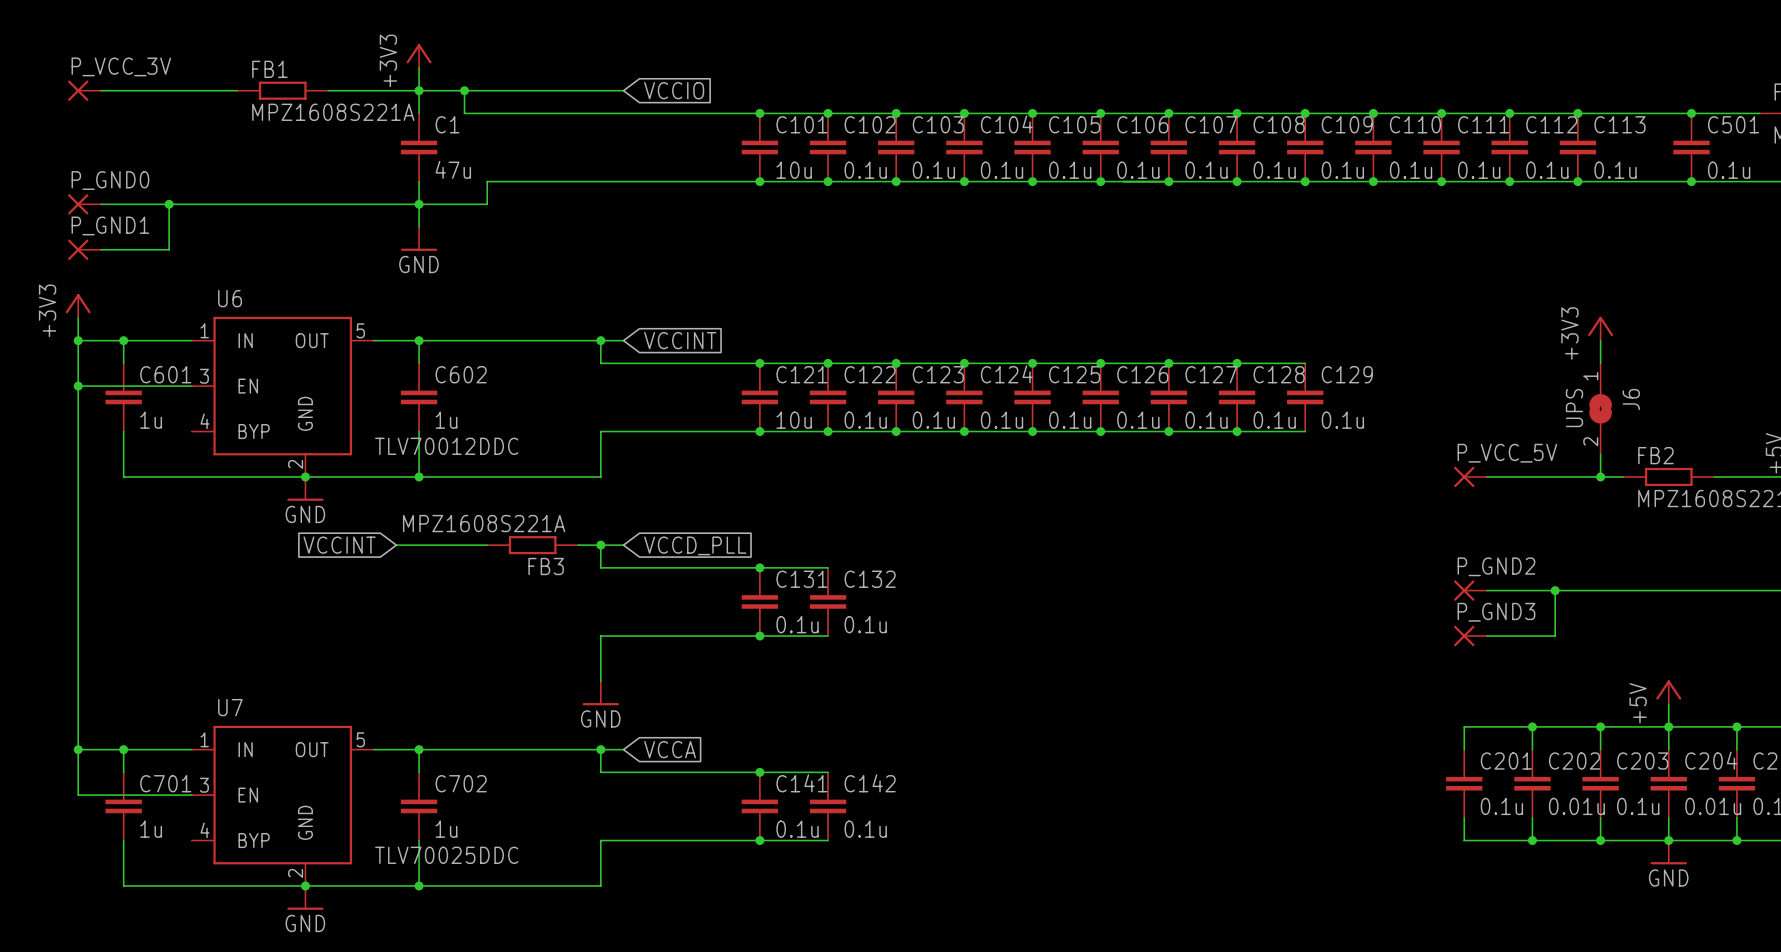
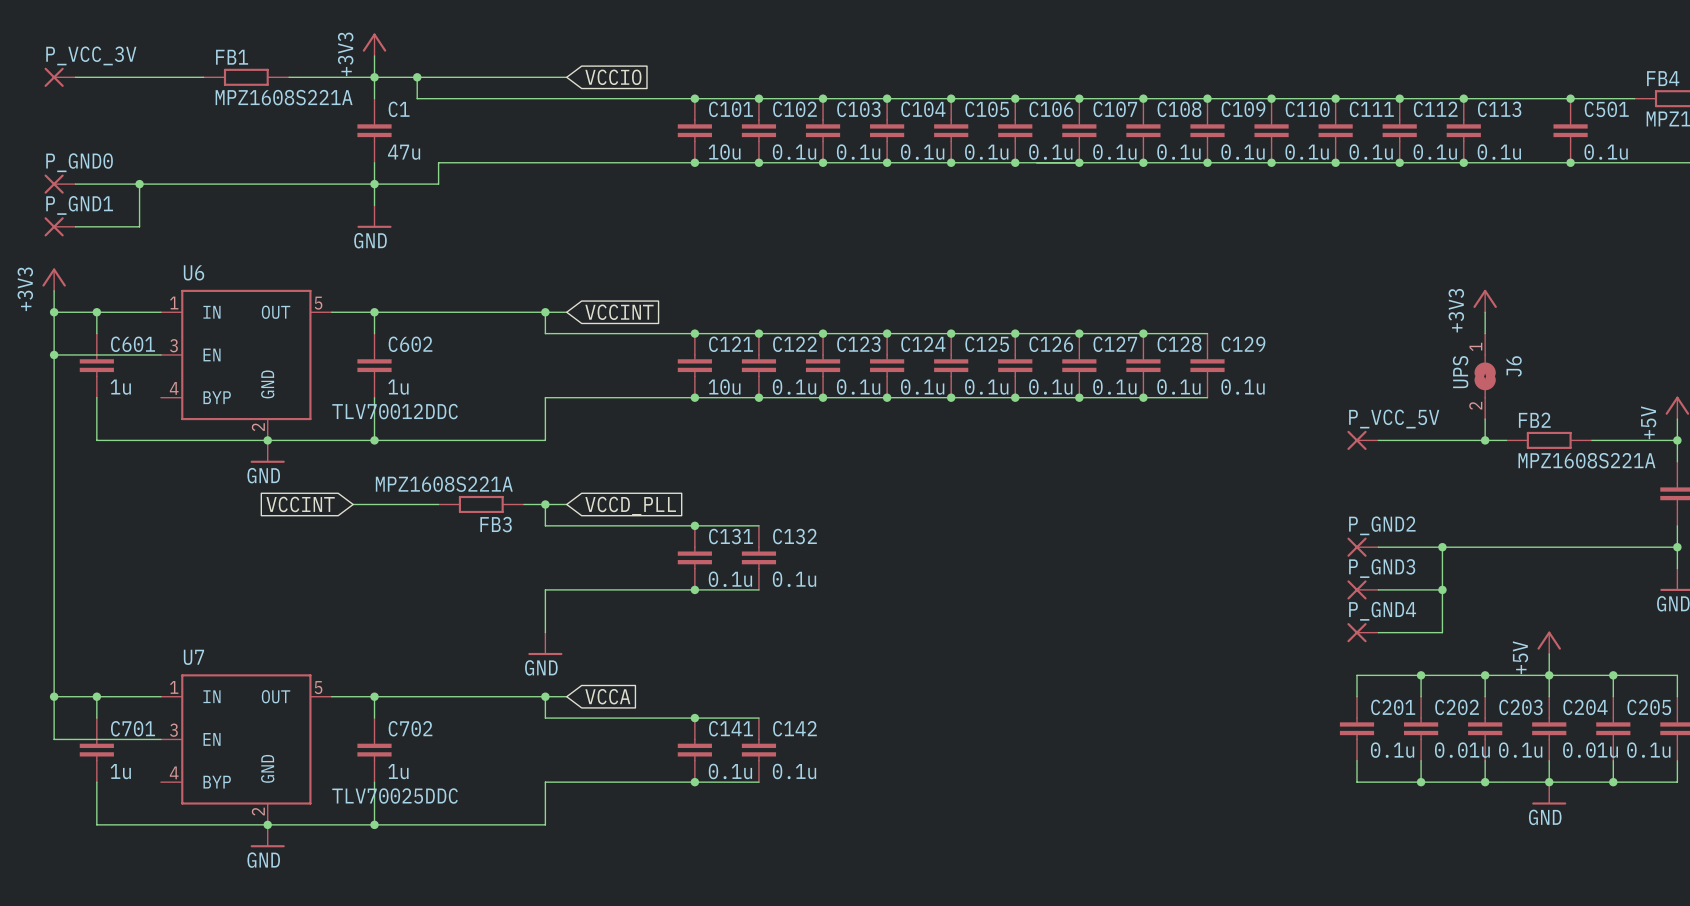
wire: none -> (1442, 589) (1442, 632) (1378, 632)
junction: none -> (1442, 589)
P_GND4: none -> (1362, 632)

